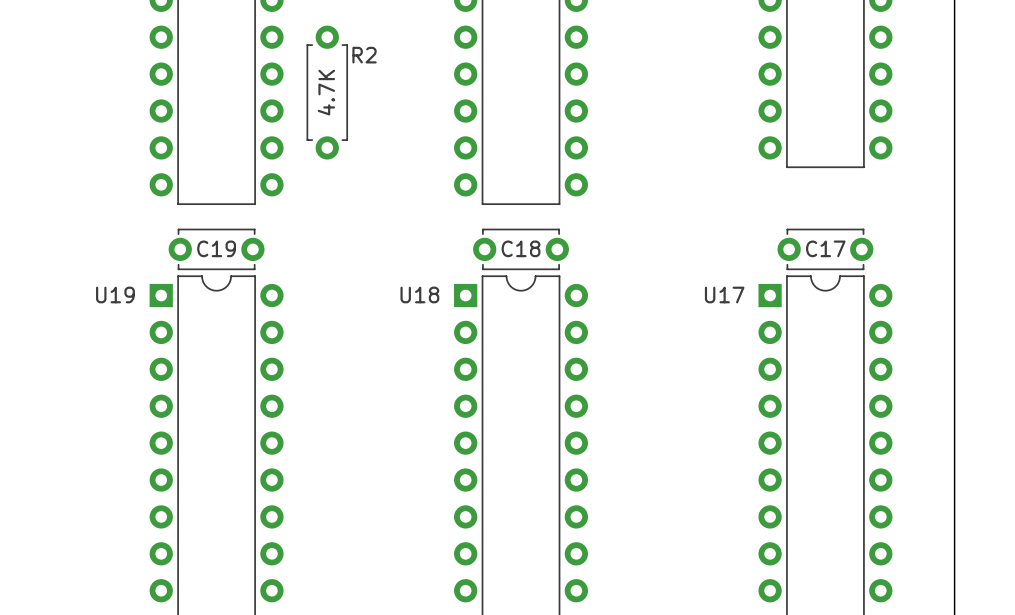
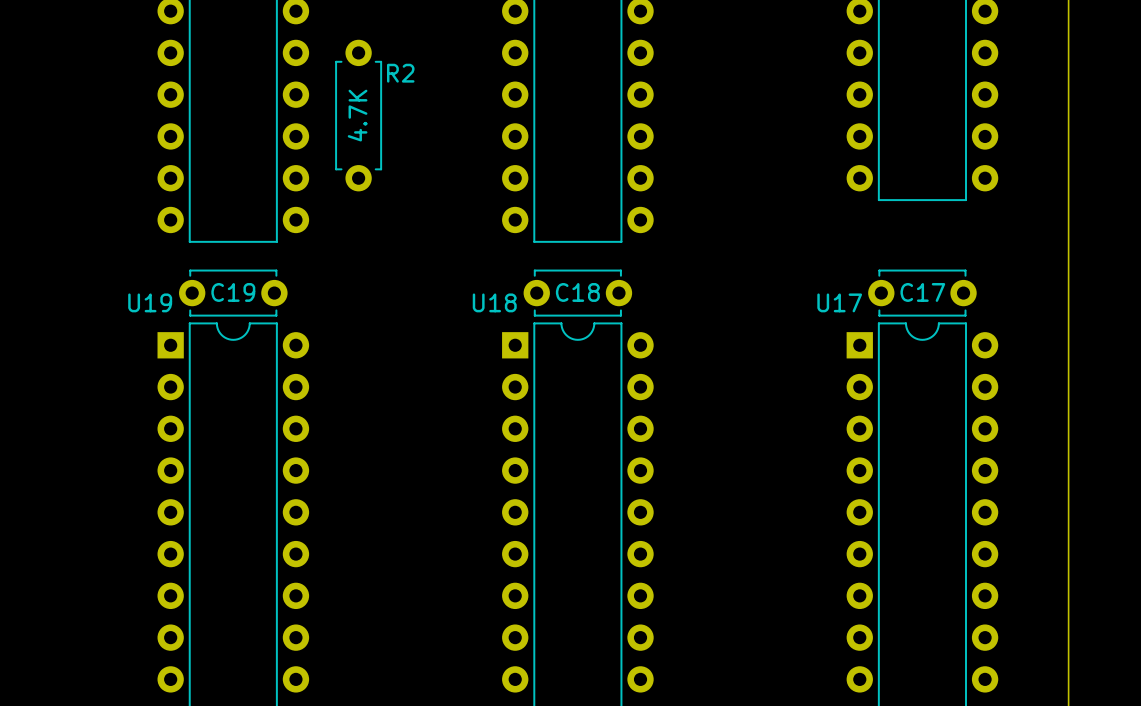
U19 name position: U19 (115, 294) -> U19 (150, 302)
U18 name position: U18 (419, 294) -> U18 (494, 302)
U17 name position: U17 (724, 294) -> U17 (839, 302)

